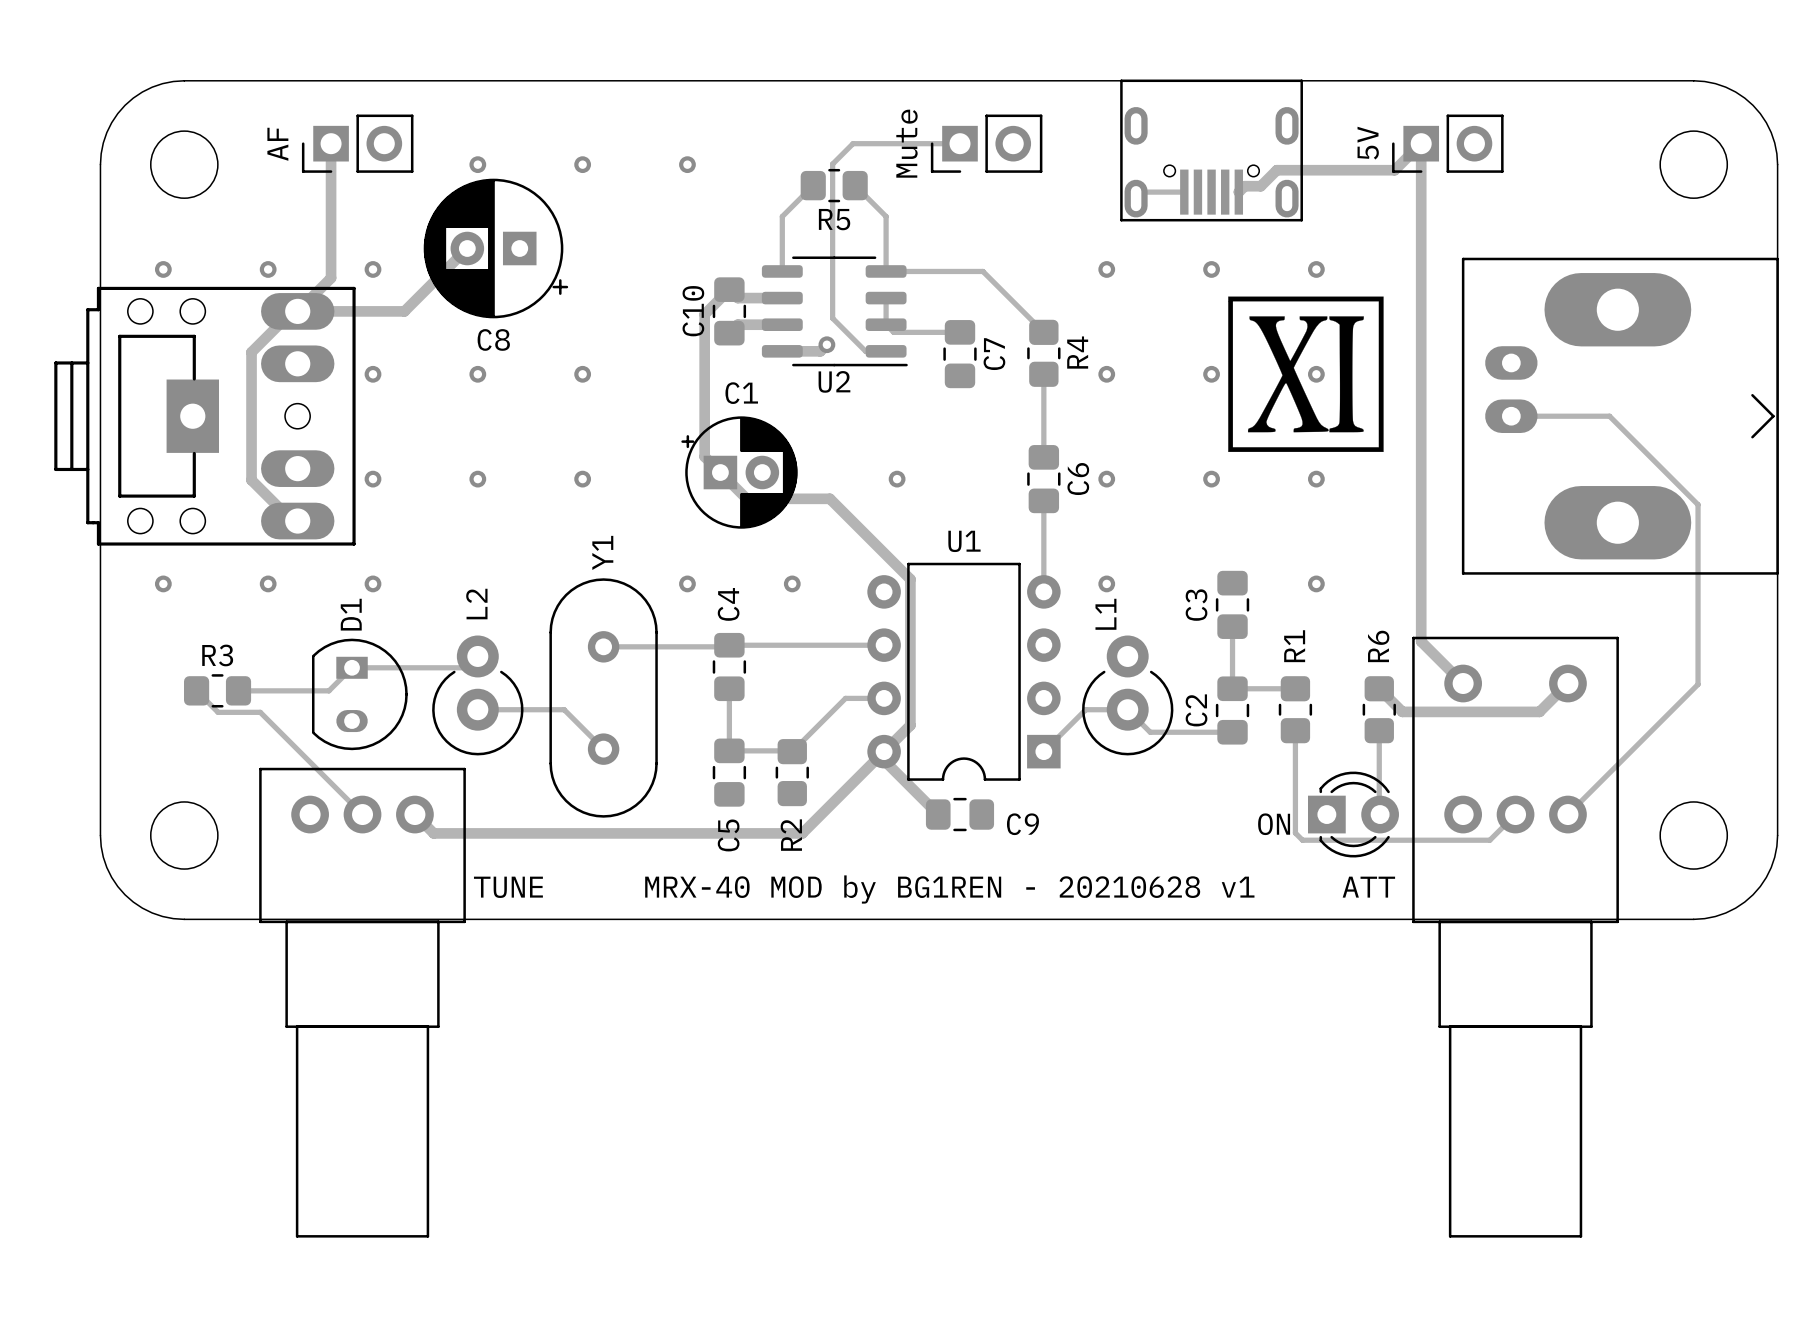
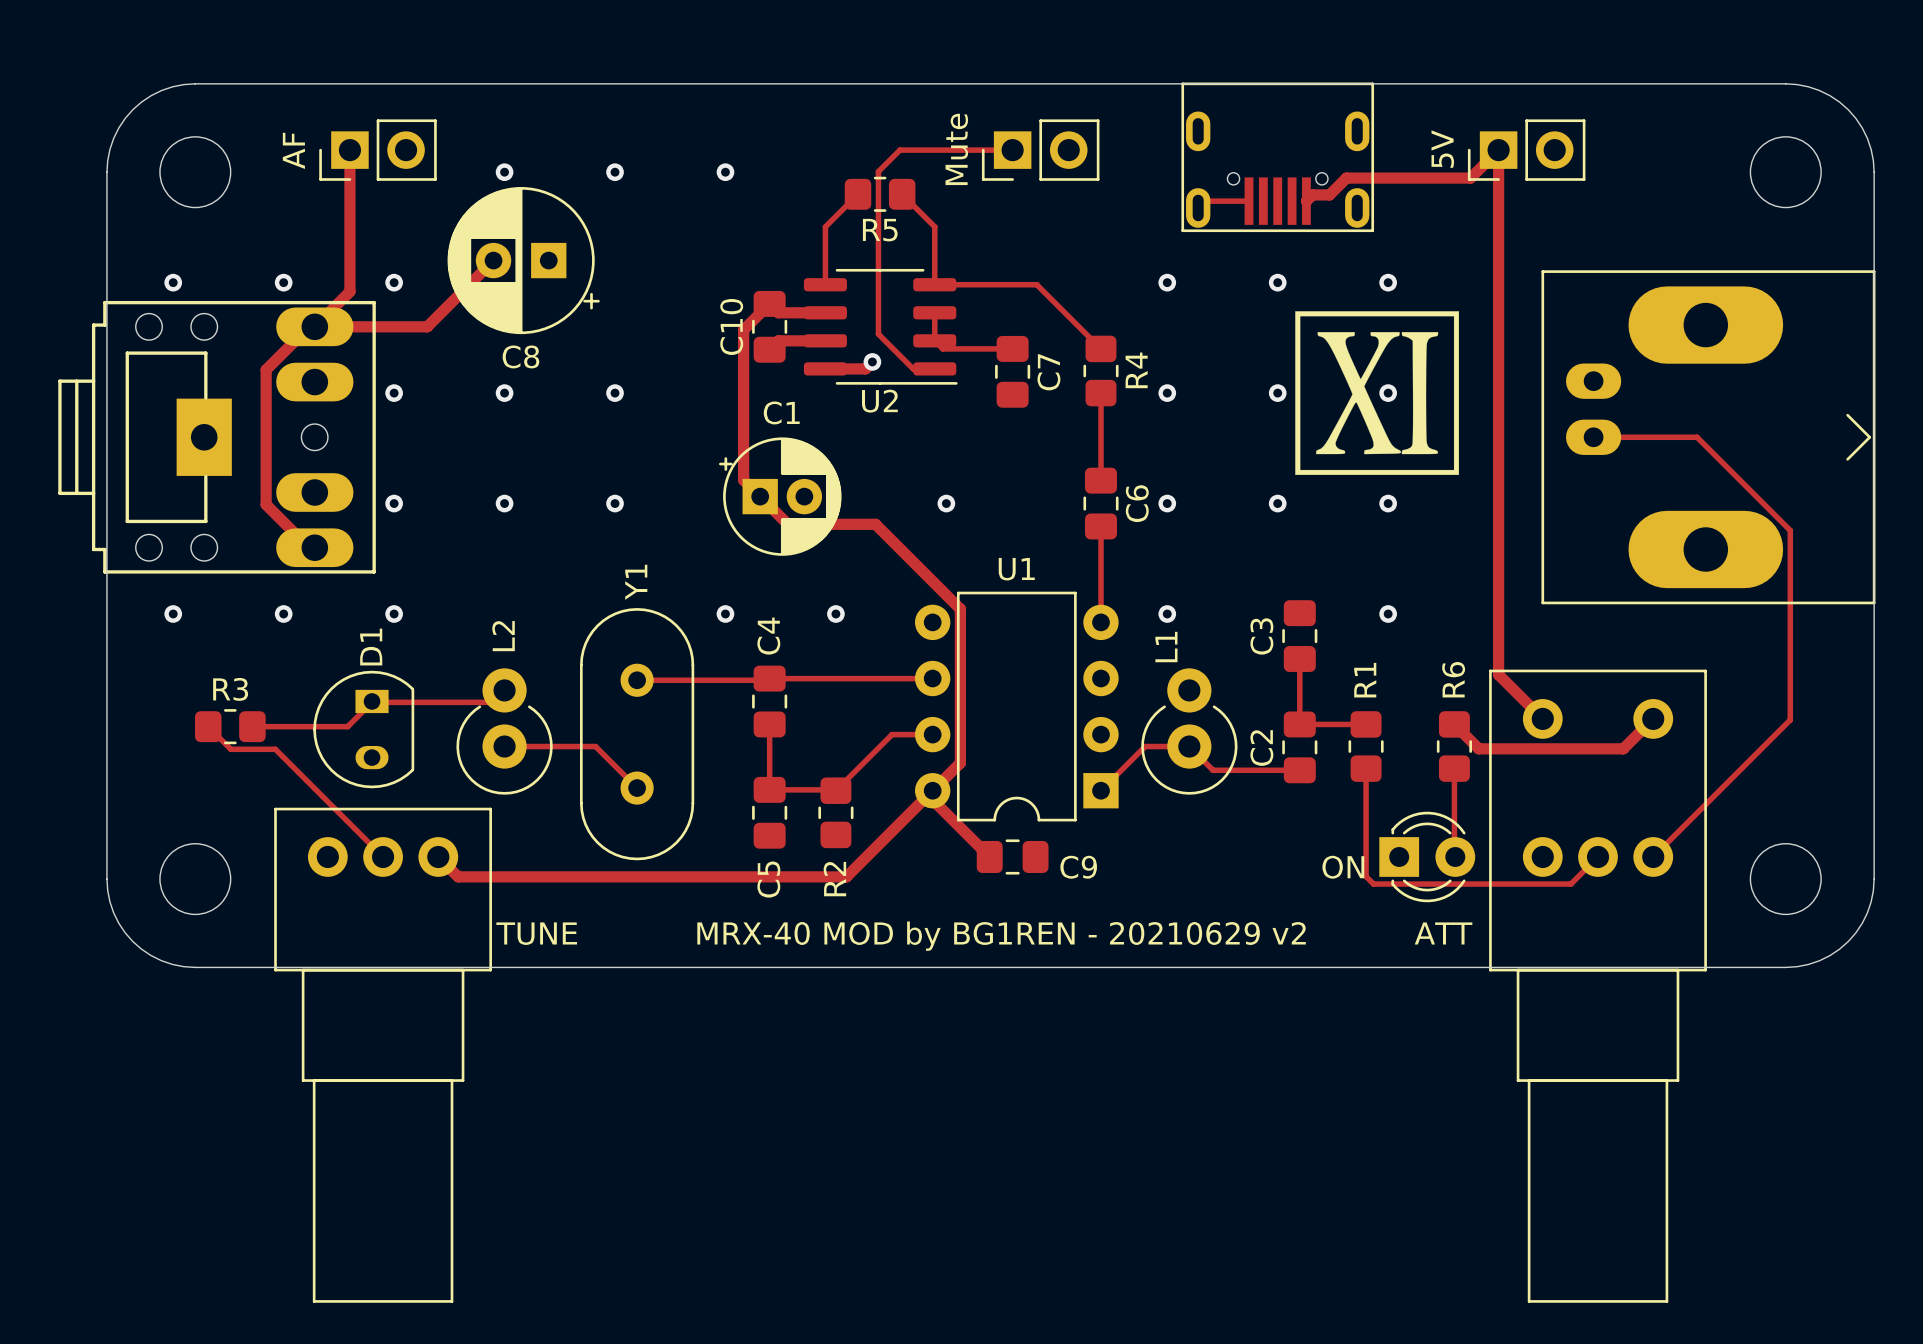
D1 footprint: [311, 638, 408, 751] -> [313, 670, 415, 789]
text: MRX-40 MOD by BG1REN - 20210628 v1 (949, 889) -> MRX-40 MOD by BG1REN - 20210629 v2 (1001, 936)

